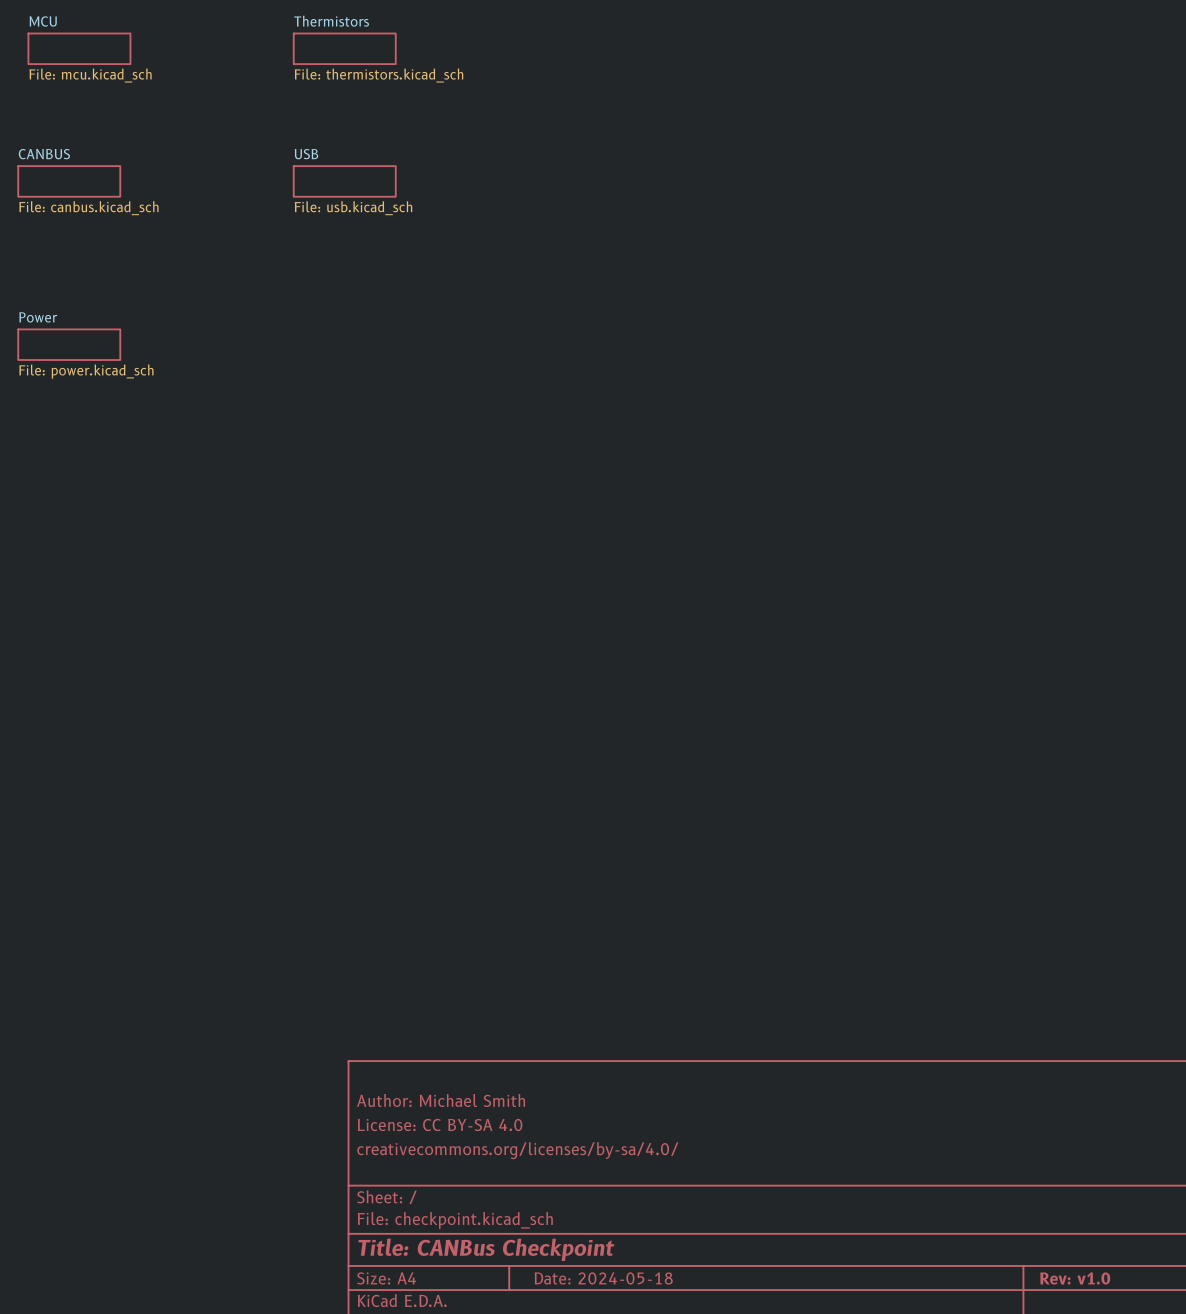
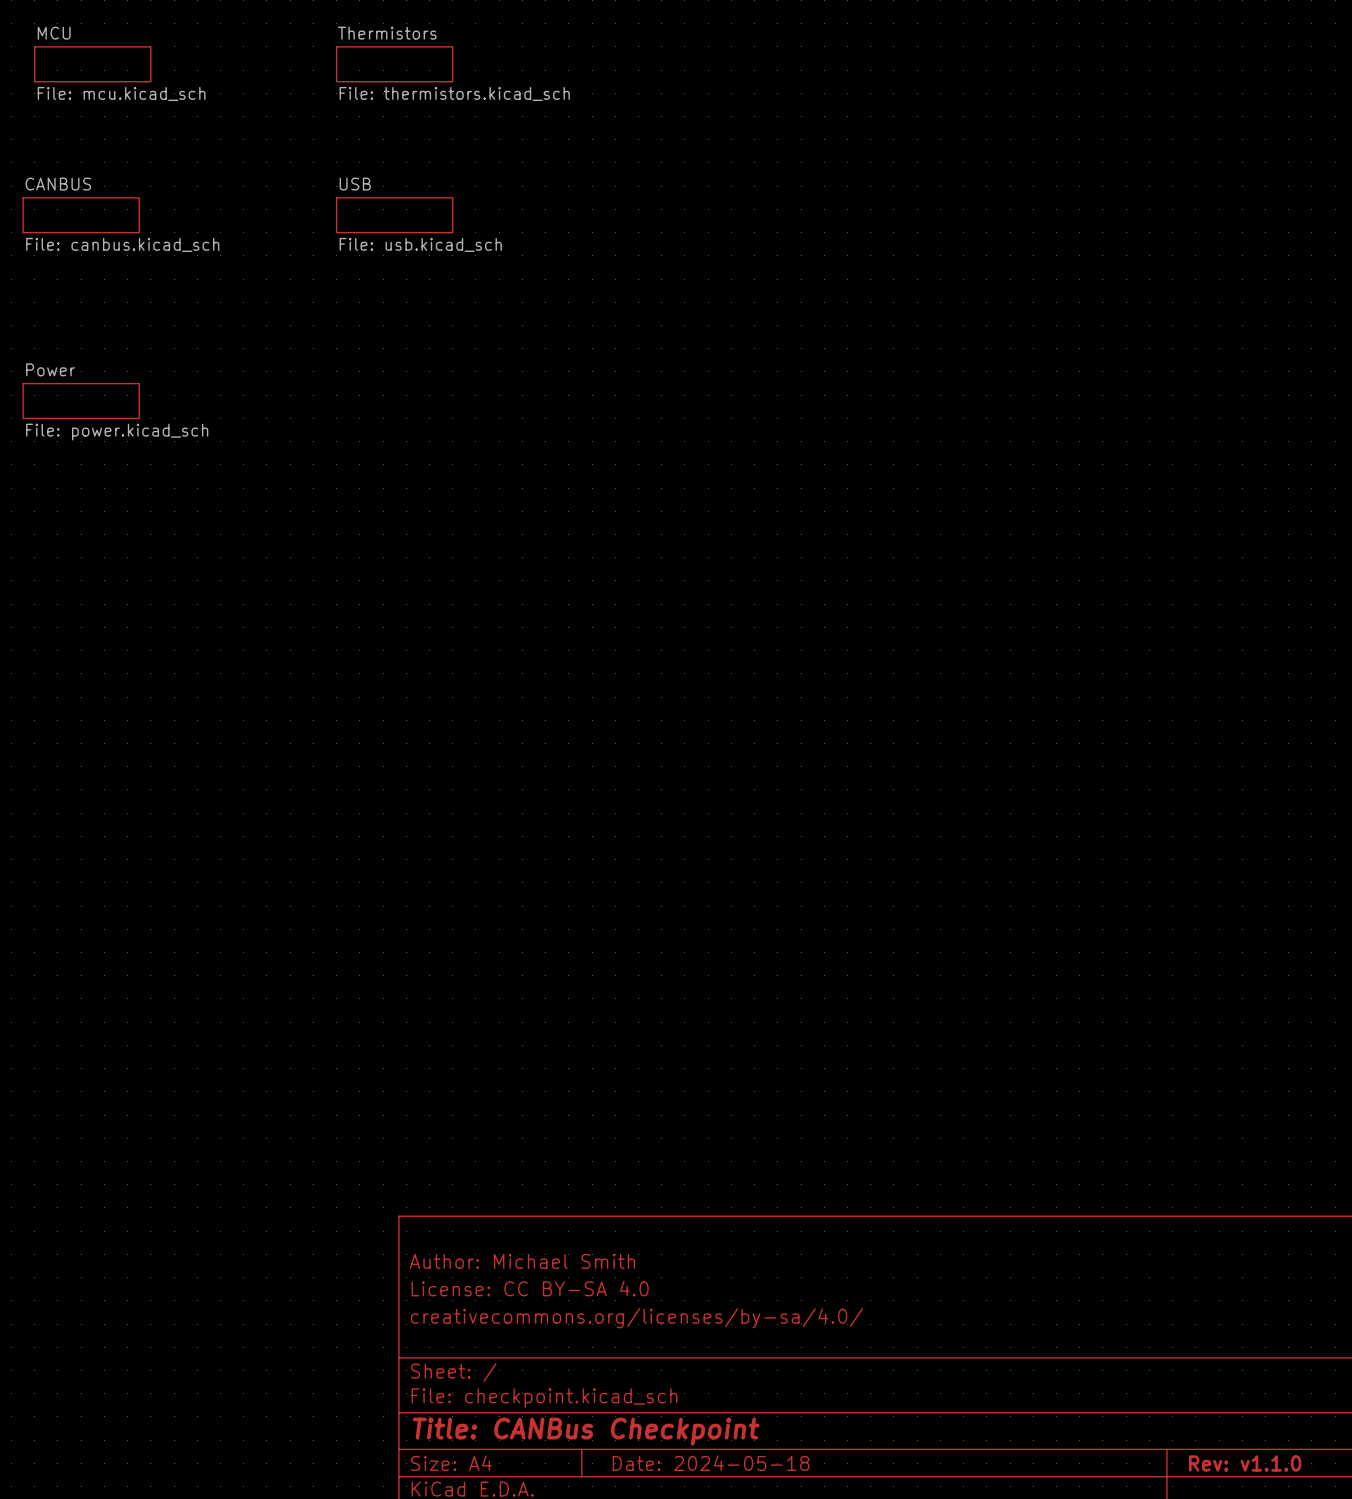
title block: Rev: v1.0 (1075, 1278) -> Rev: v1.1.0 (1245, 1463)

